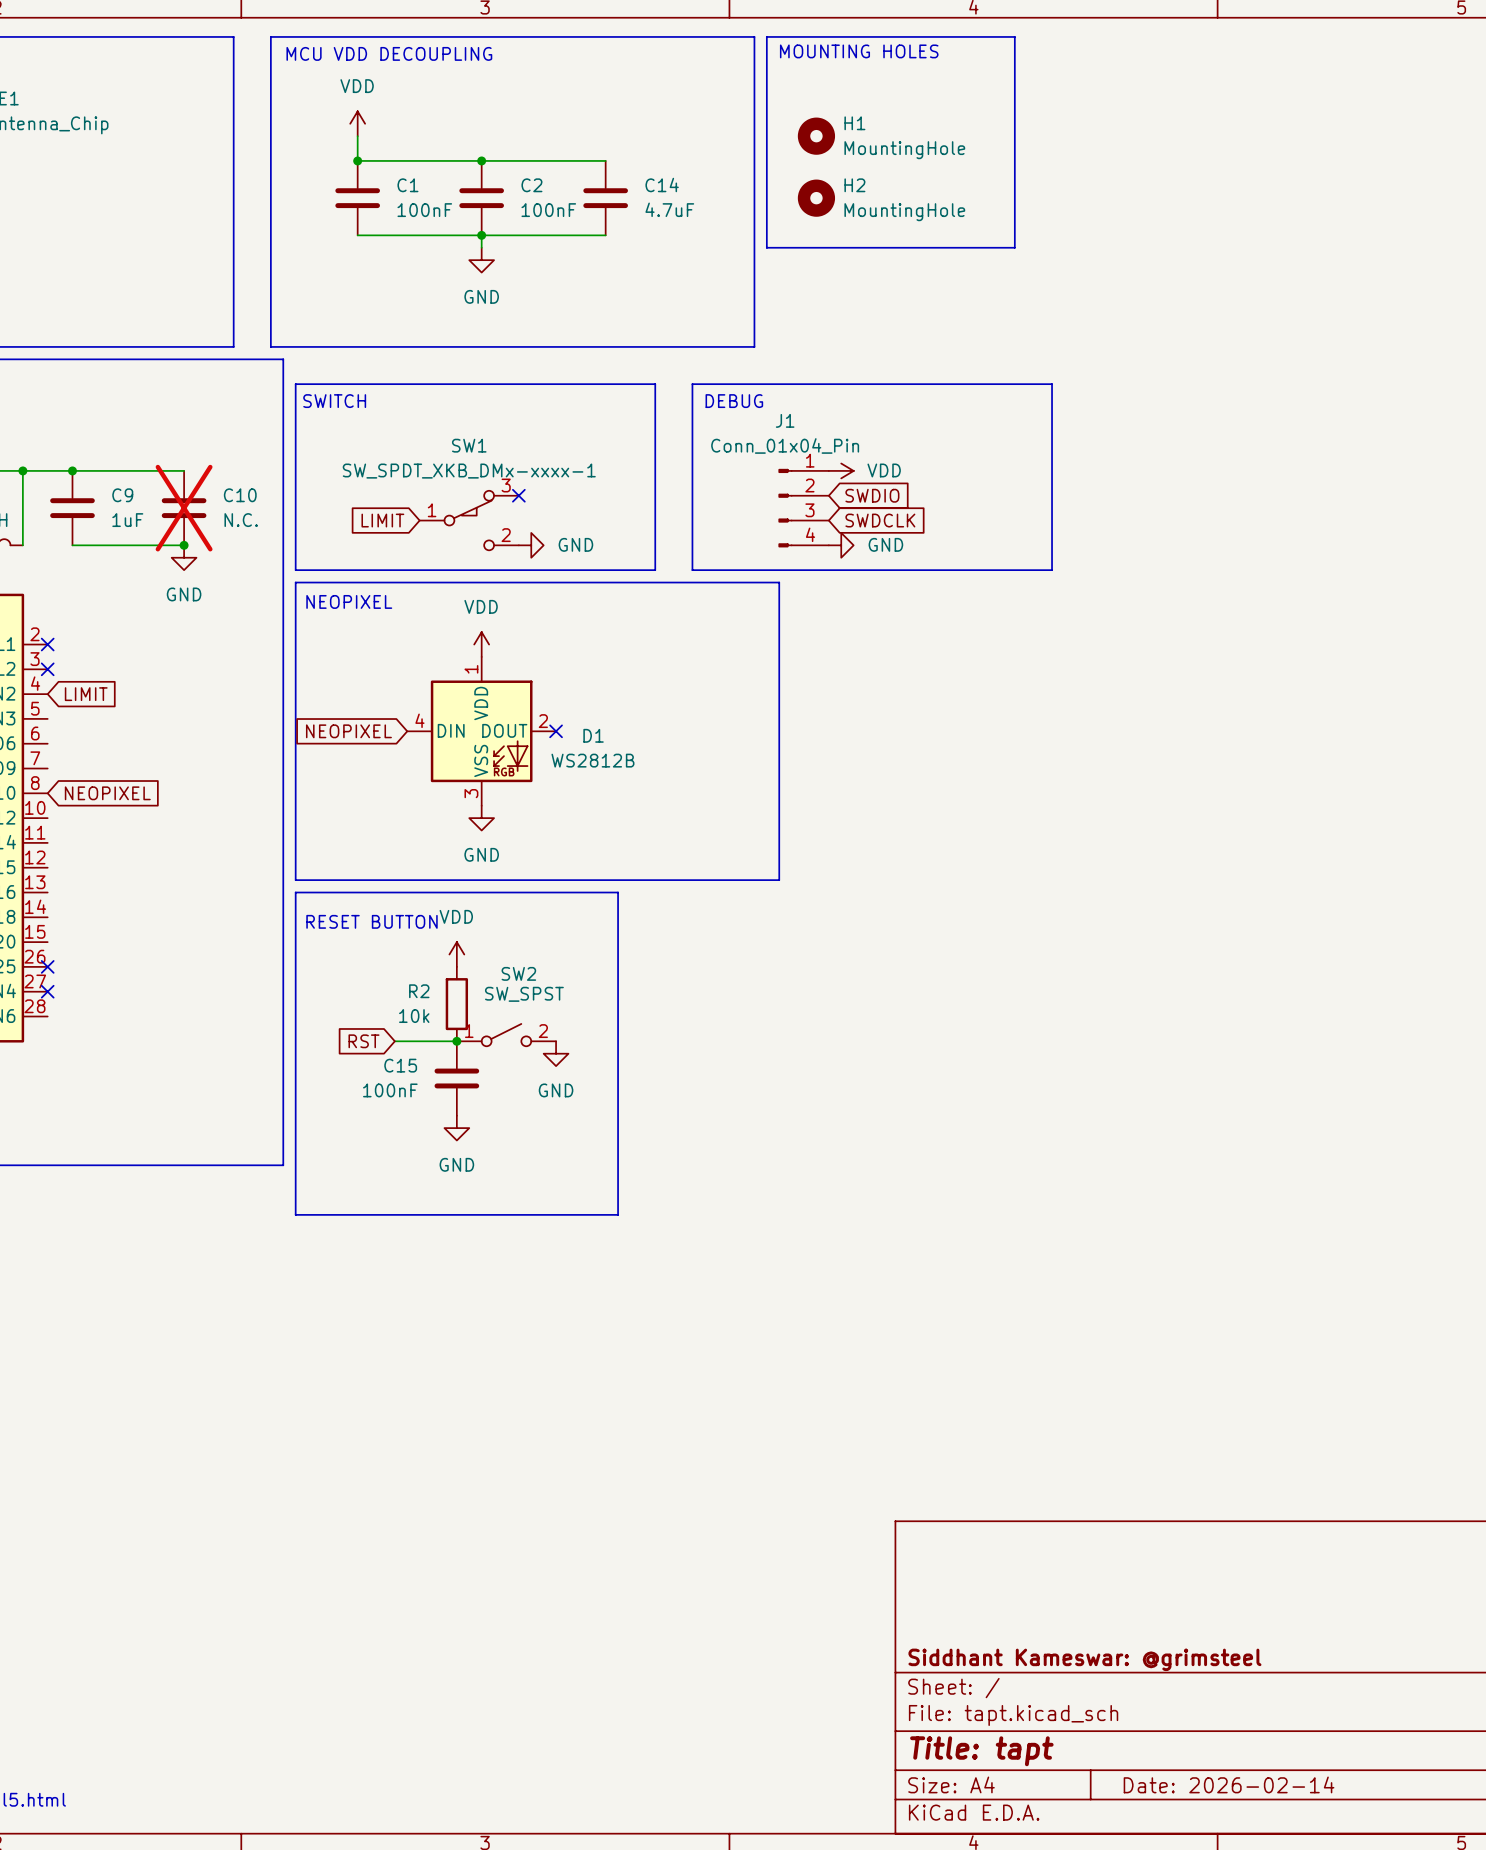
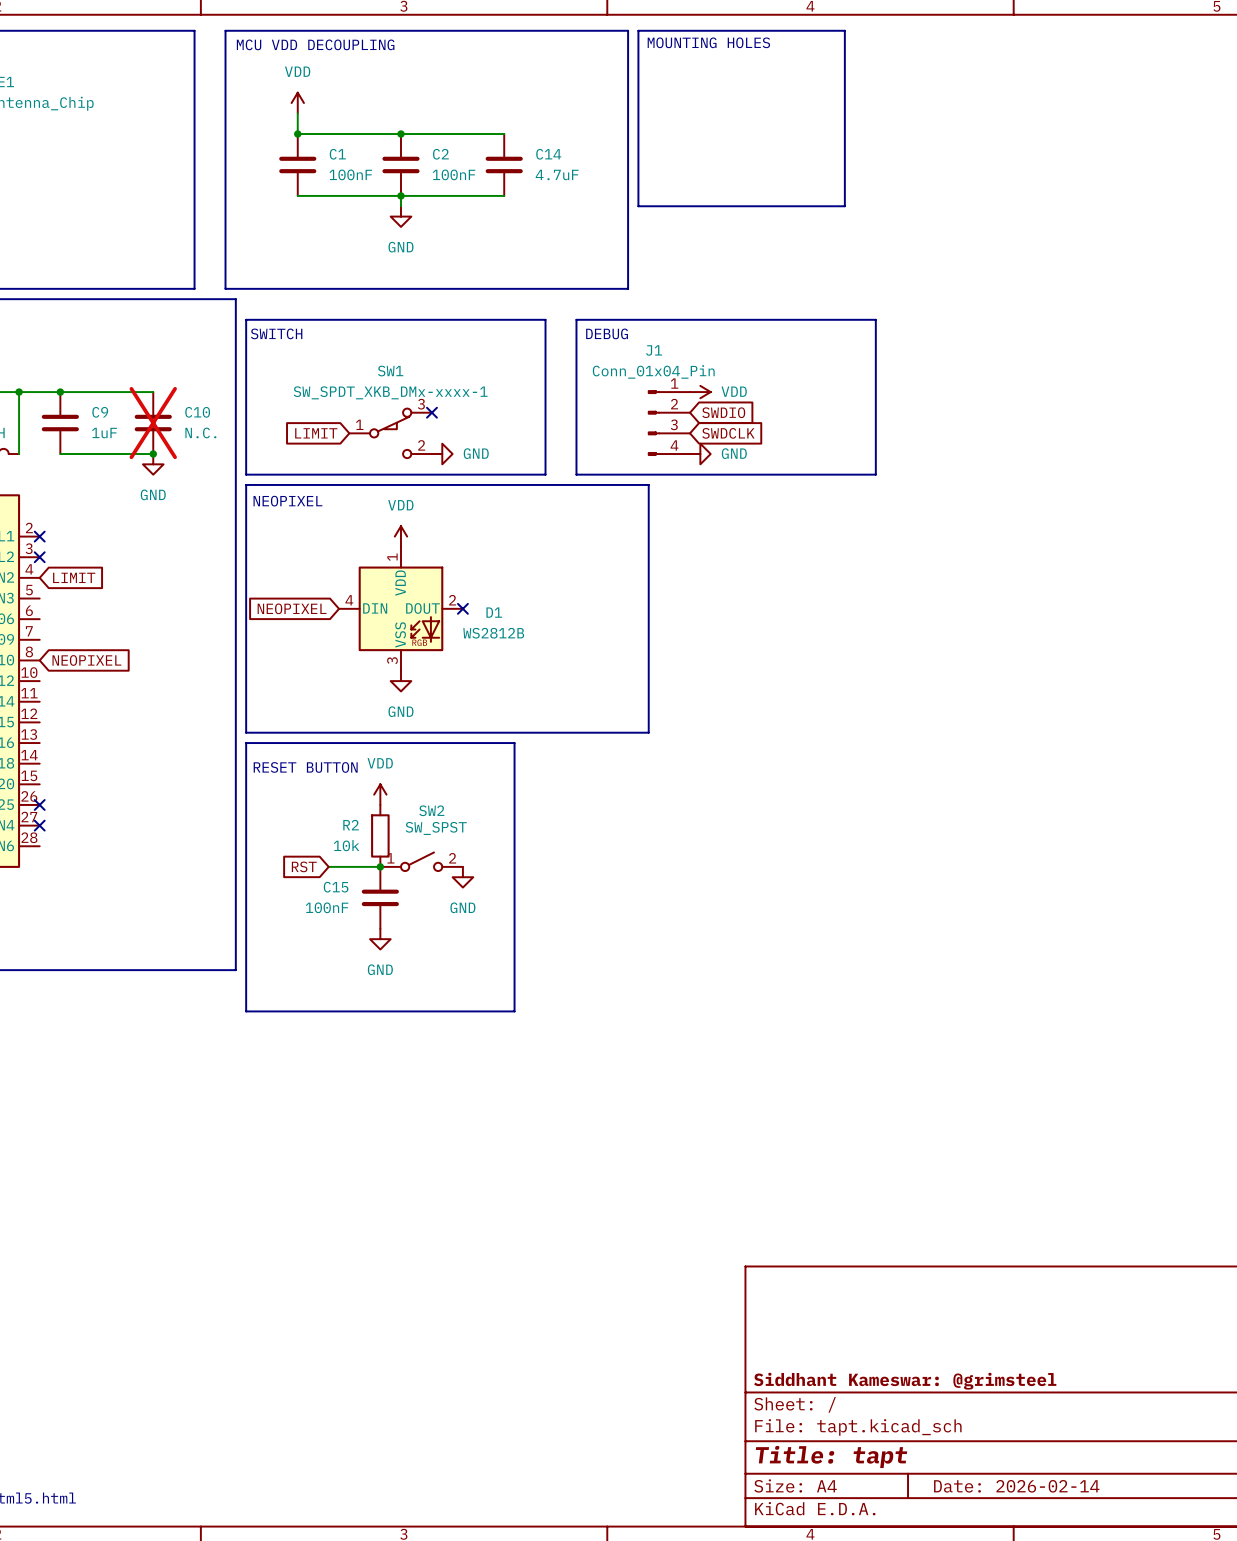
H1: MountingHole (816, 136) -> none
H2: MountingHole (816, 198) -> none

